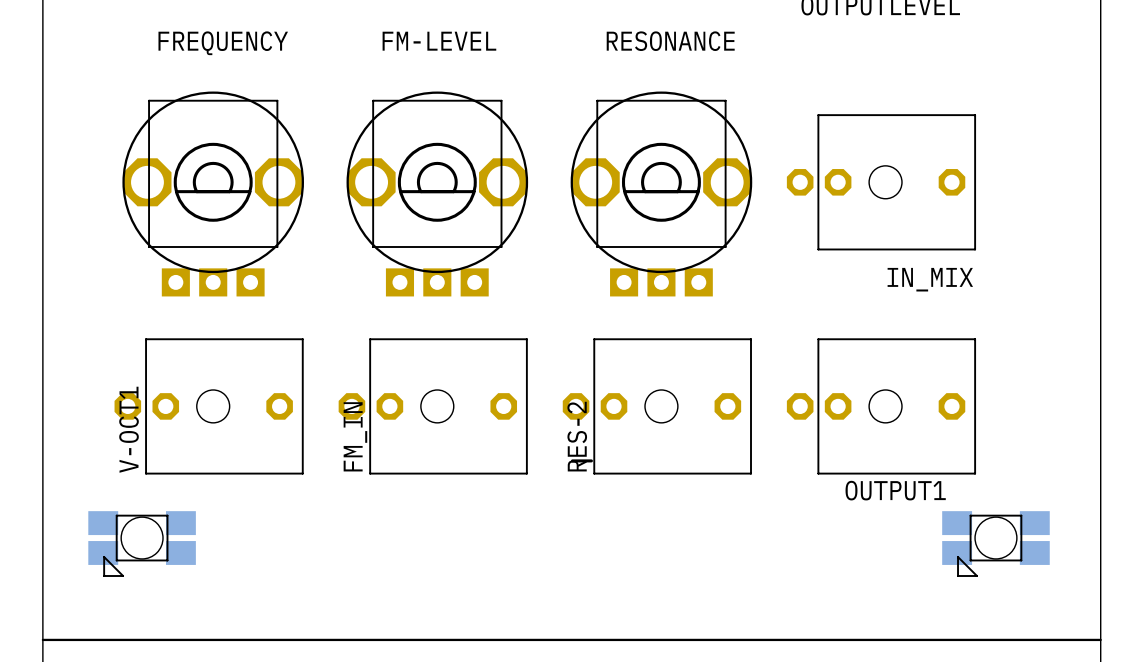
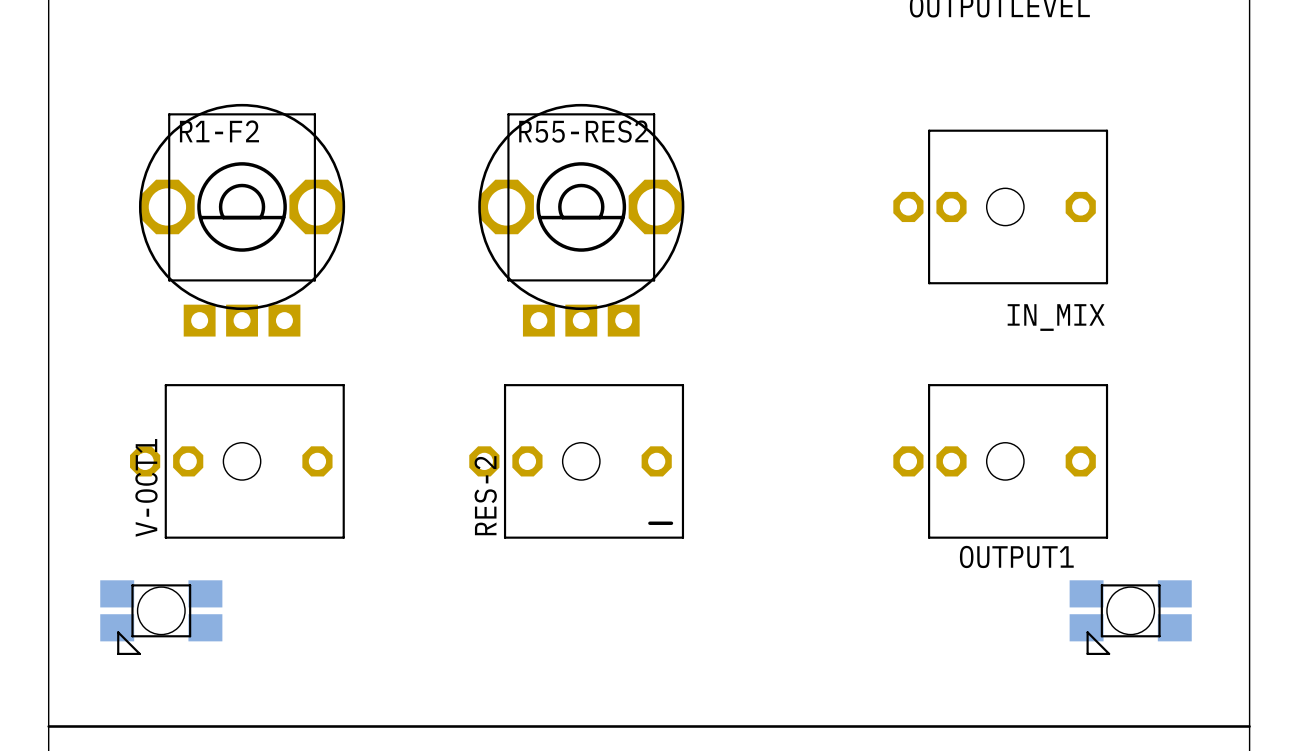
FREQUENCY name: FREQUENCY (223, 43) -> R1-F2 (219, 131)
drawing: [346, 91, 529, 274] -> none
drawing: none -> [478, 103, 685, 311]
drawing: [570, 91, 753, 274] -> none
FM-LEVEL: (437, 198) -> none
R55-RES2: none -> (581, 224)
RESONANCE: (661, 198) -> none
FM_IN: (433, 406) -> none
RES-2 position: (657, 406) -> (576, 461)

